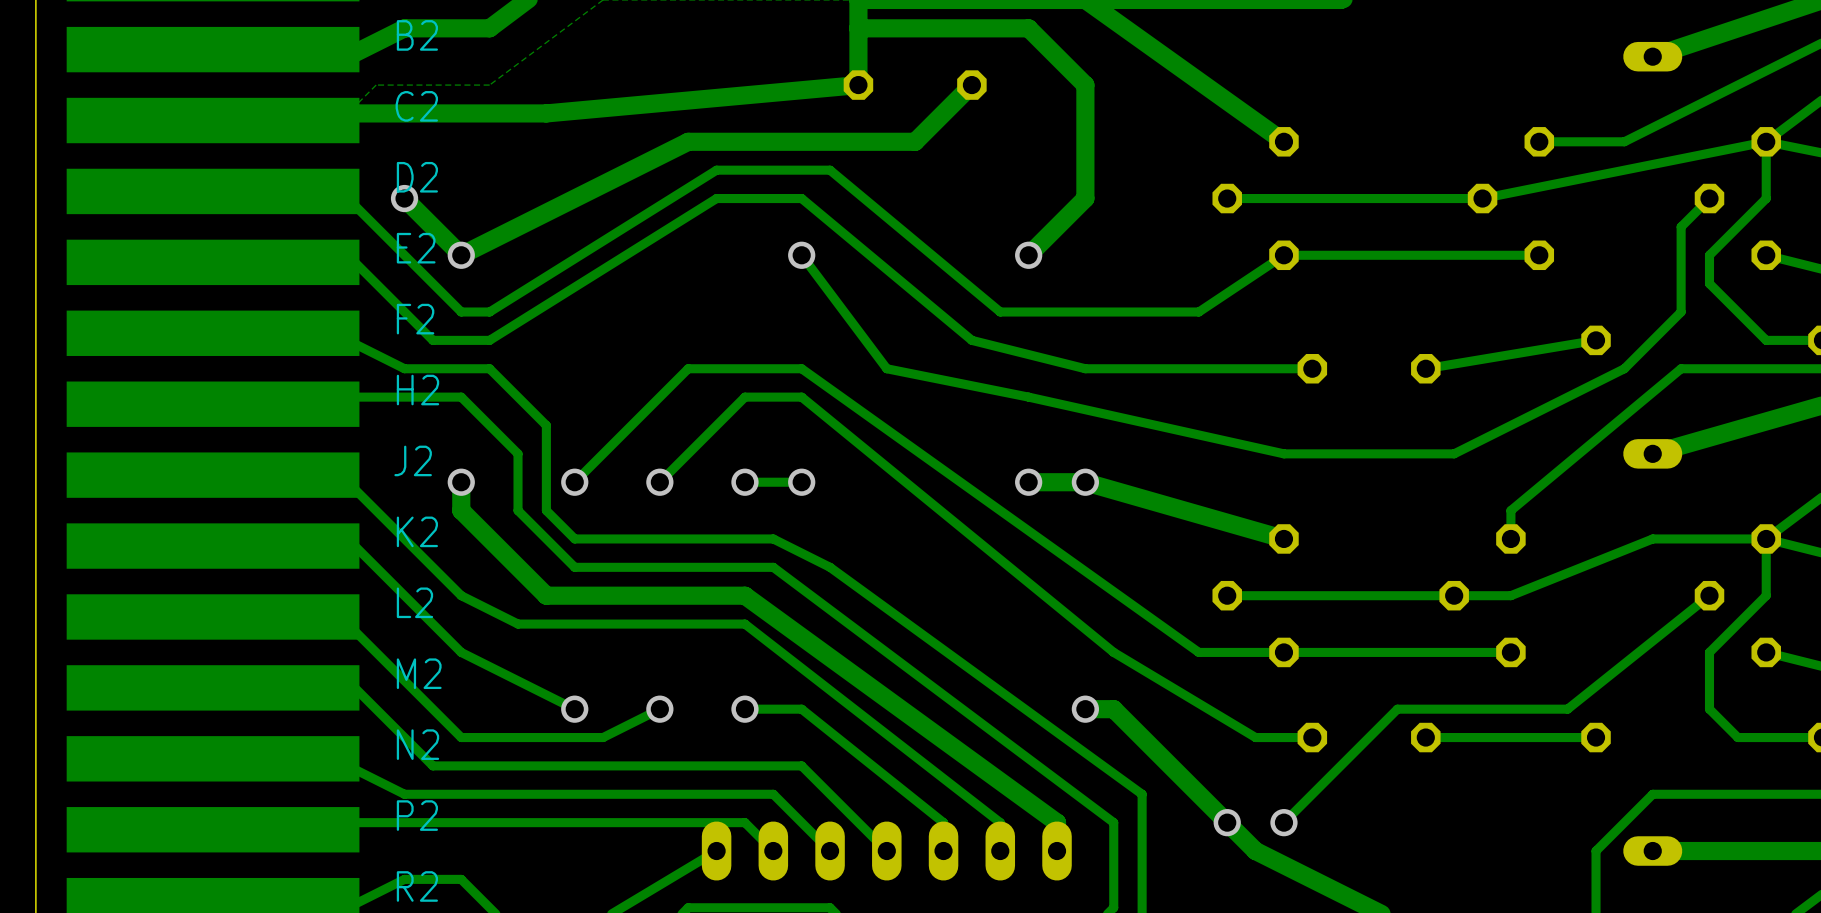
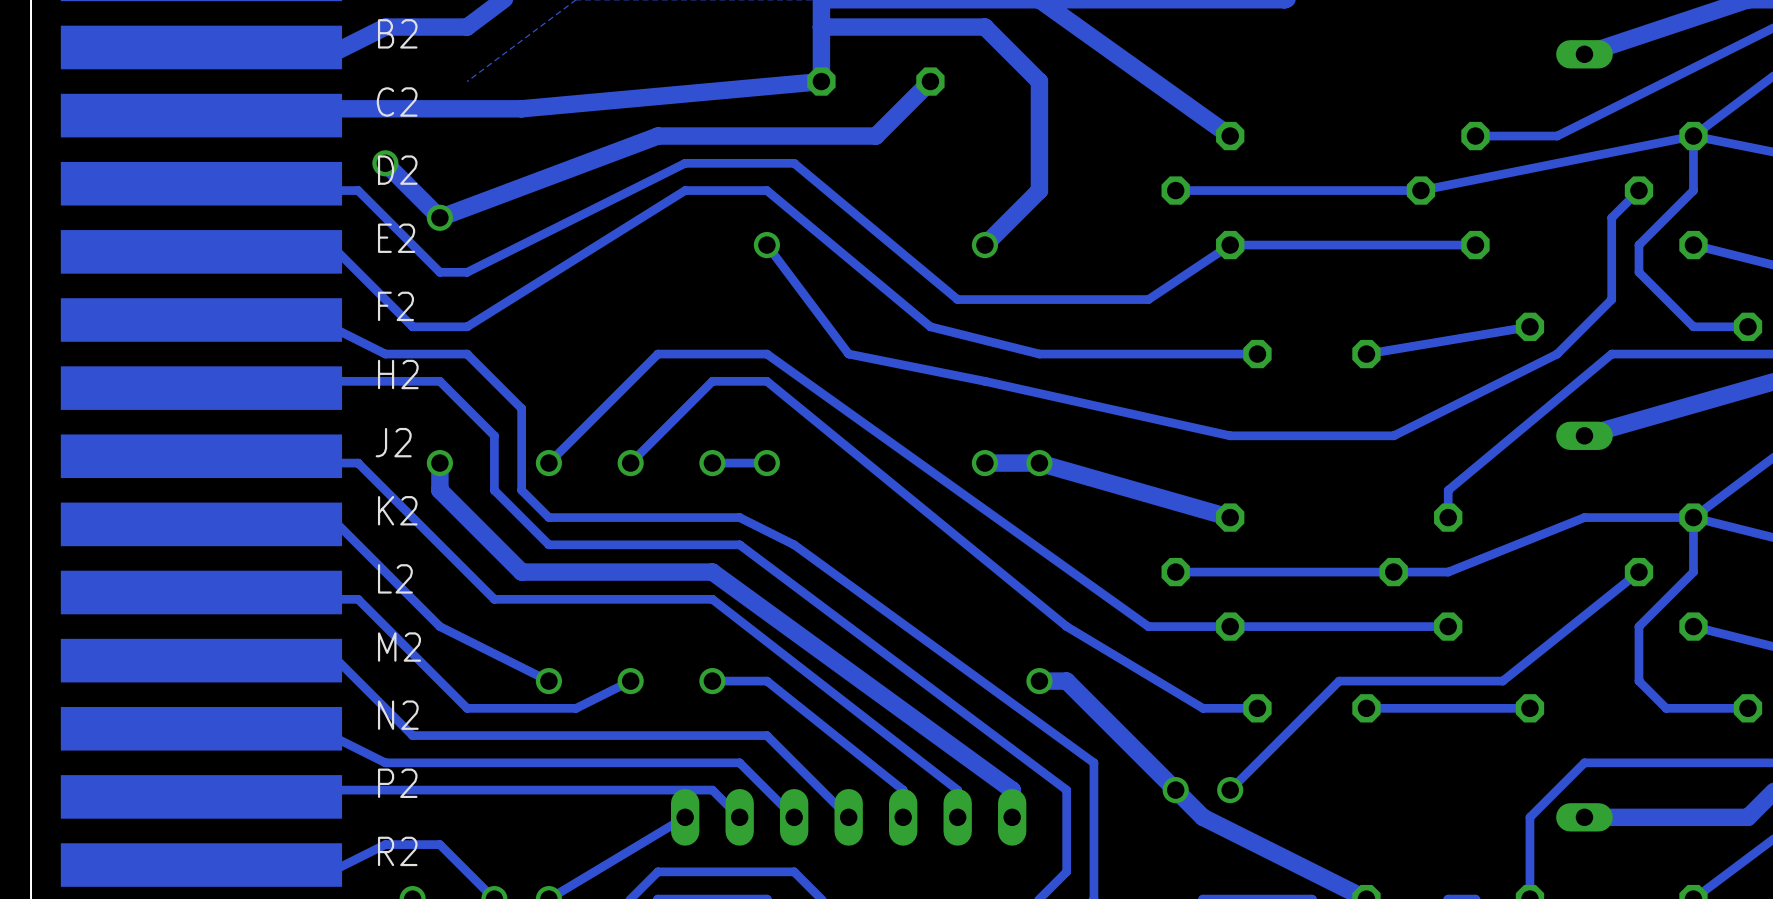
zone outline: (489, 85) (376, 85) (347, 113) -> none
track: (688, 141) (461, 255) (404, 198) -> (657, 136) (439, 217) (385, 163)
track: (716, 170) (489, 312) (461, 312) (347, 198) -> (685, 163) (467, 272) (439, 272) (358, 190) (330, 190)
via position: (404, 198) -> (385, 163)
via position: (461, 255) -> (439, 217)
track: (347, 482) (461, 595) (518, 624) -> (330, 463) (358, 463) (494, 599)
track: (347, 624) (461, 737) (489, 737) -> (330, 599) (358, 599) (467, 708)

